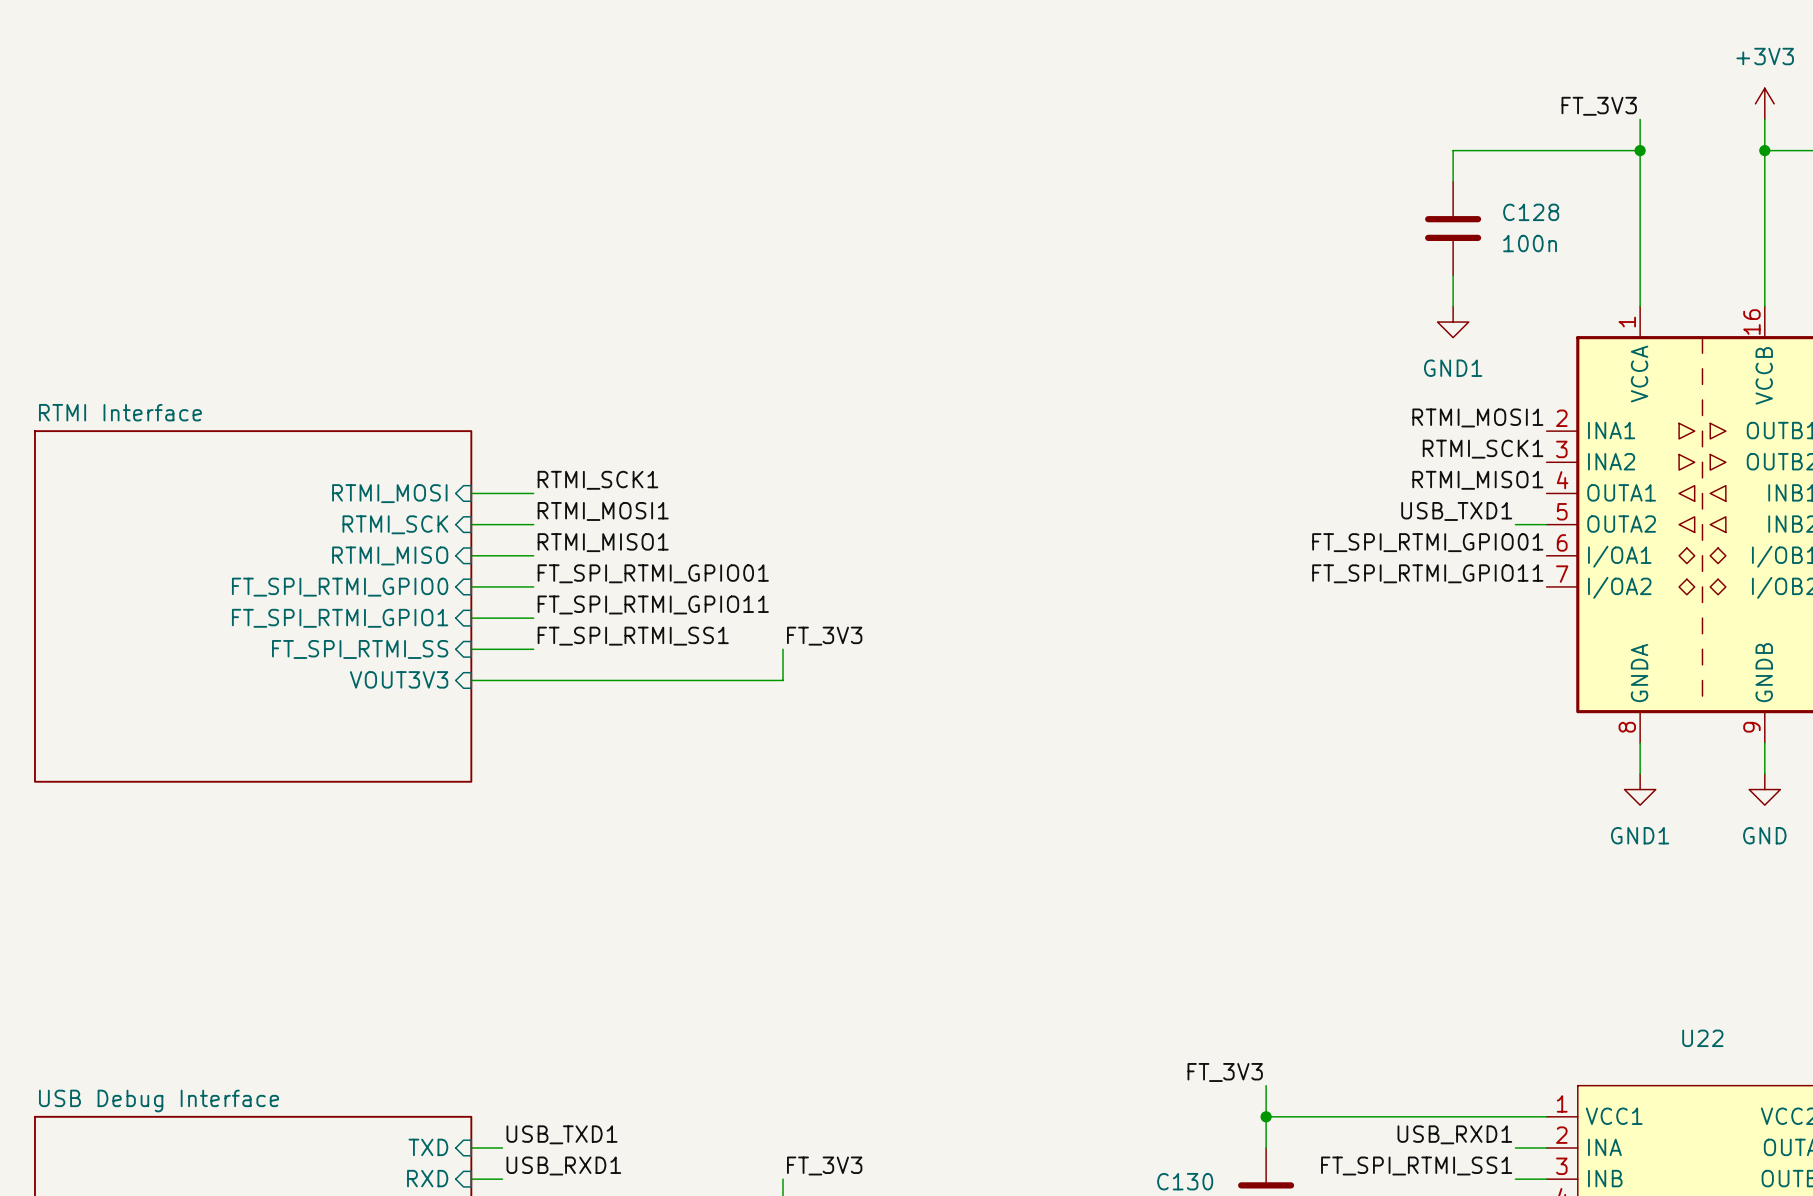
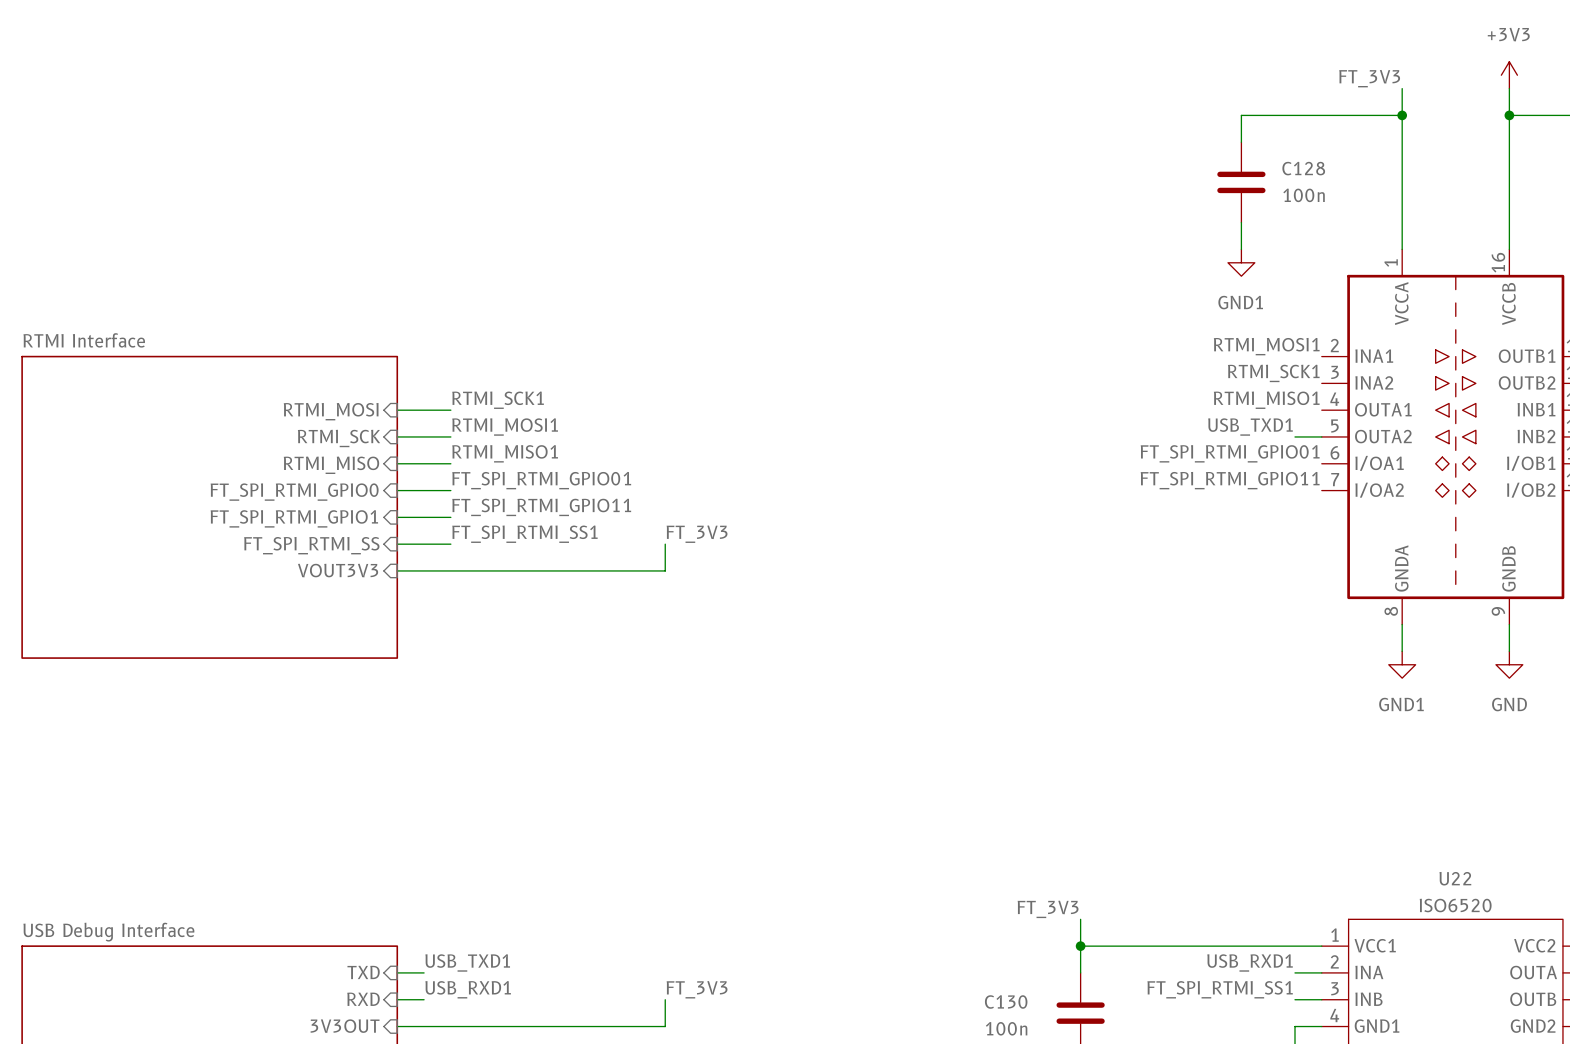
U22 value: none -> ISO6520 (1455, 905)

